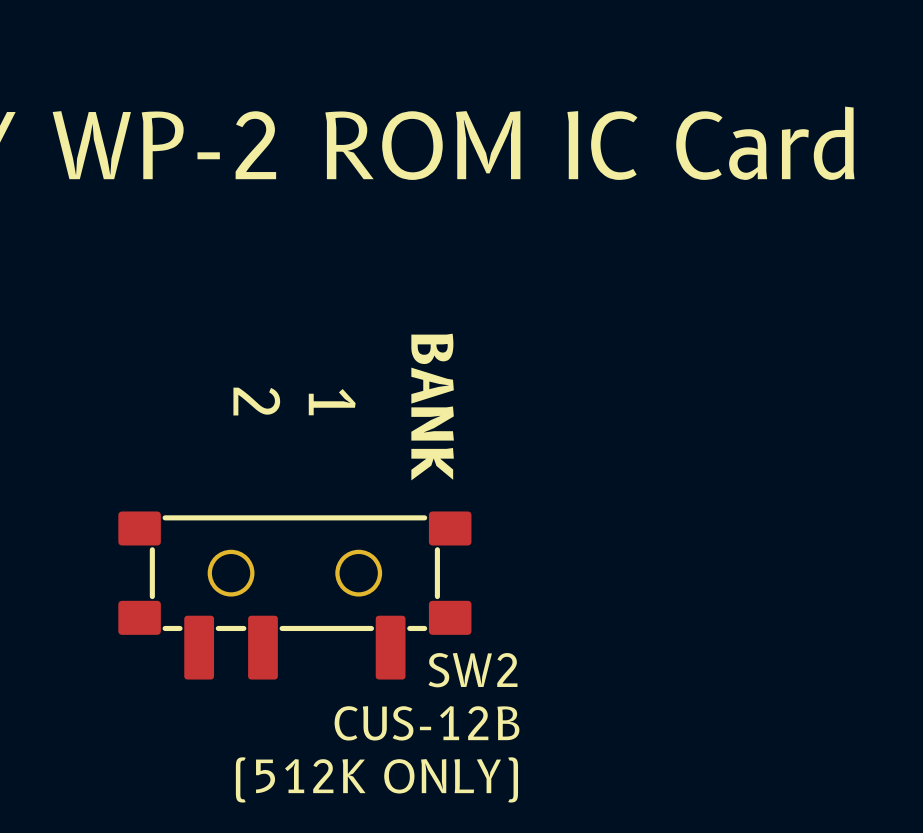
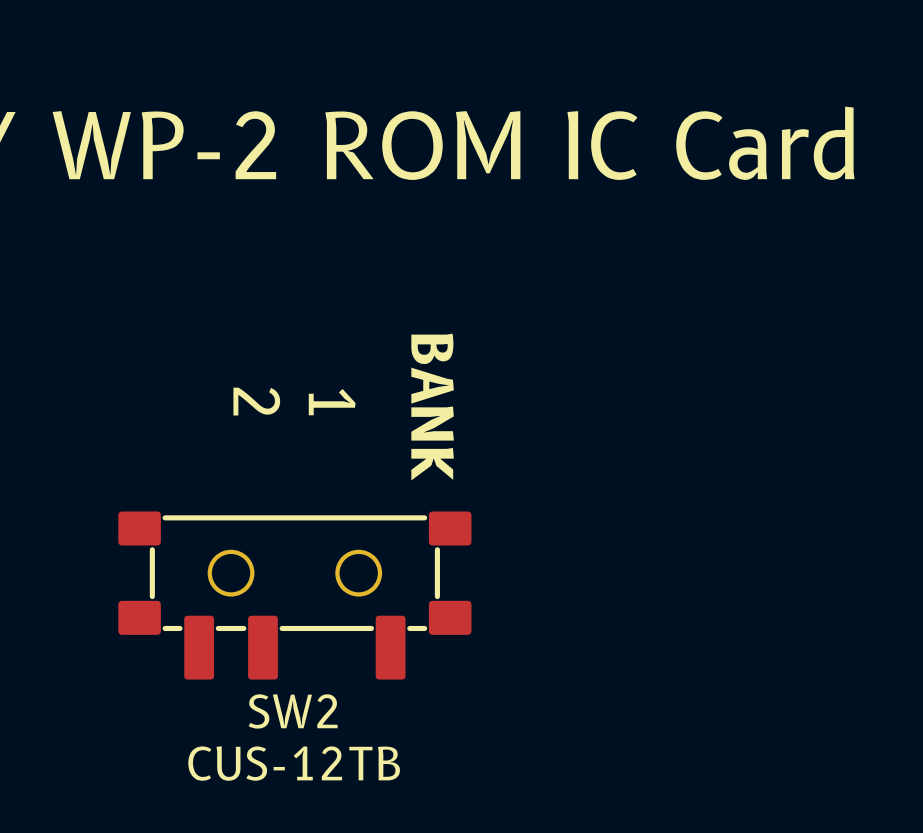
SW2 name position: SW2 (472, 670) -> SW2 (293, 711)
SW2 value: CUS-12B (426, 723) -> CUS-12TB (294, 763)
text: (512K ONLY) (376, 779) -> none

